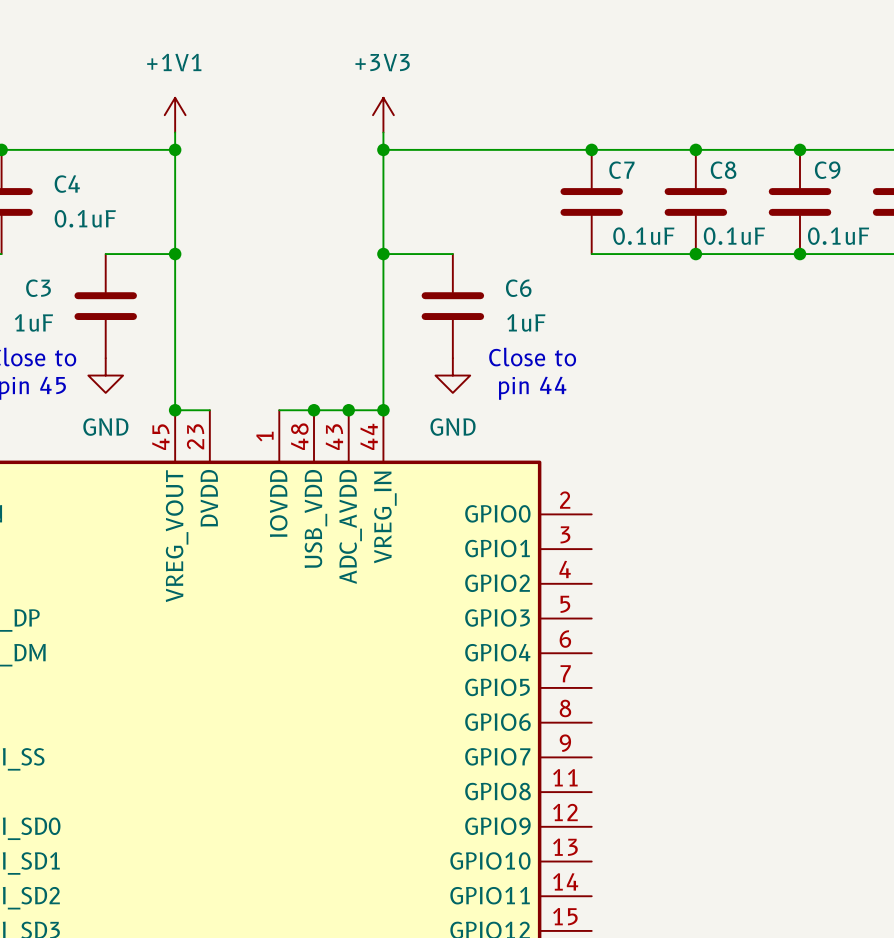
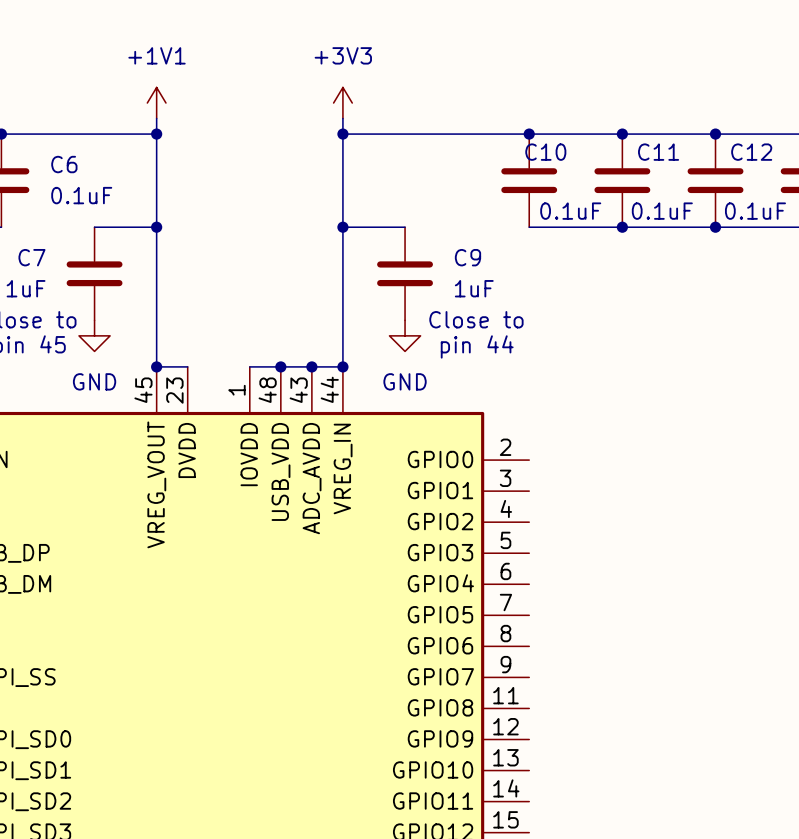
C7 name: C7 (621, 170) -> C10 (545, 152)
C8 name: C8 (723, 170) -> C11 (658, 152)
C9 name: C9 (827, 170) -> C12 (751, 152)
C4 name: C4 (67, 184) -> C6 (64, 164)
C3 name: C3 (38, 288) -> C7 (31, 257)
C6 name: C6 (518, 288) -> C9 (467, 257)

